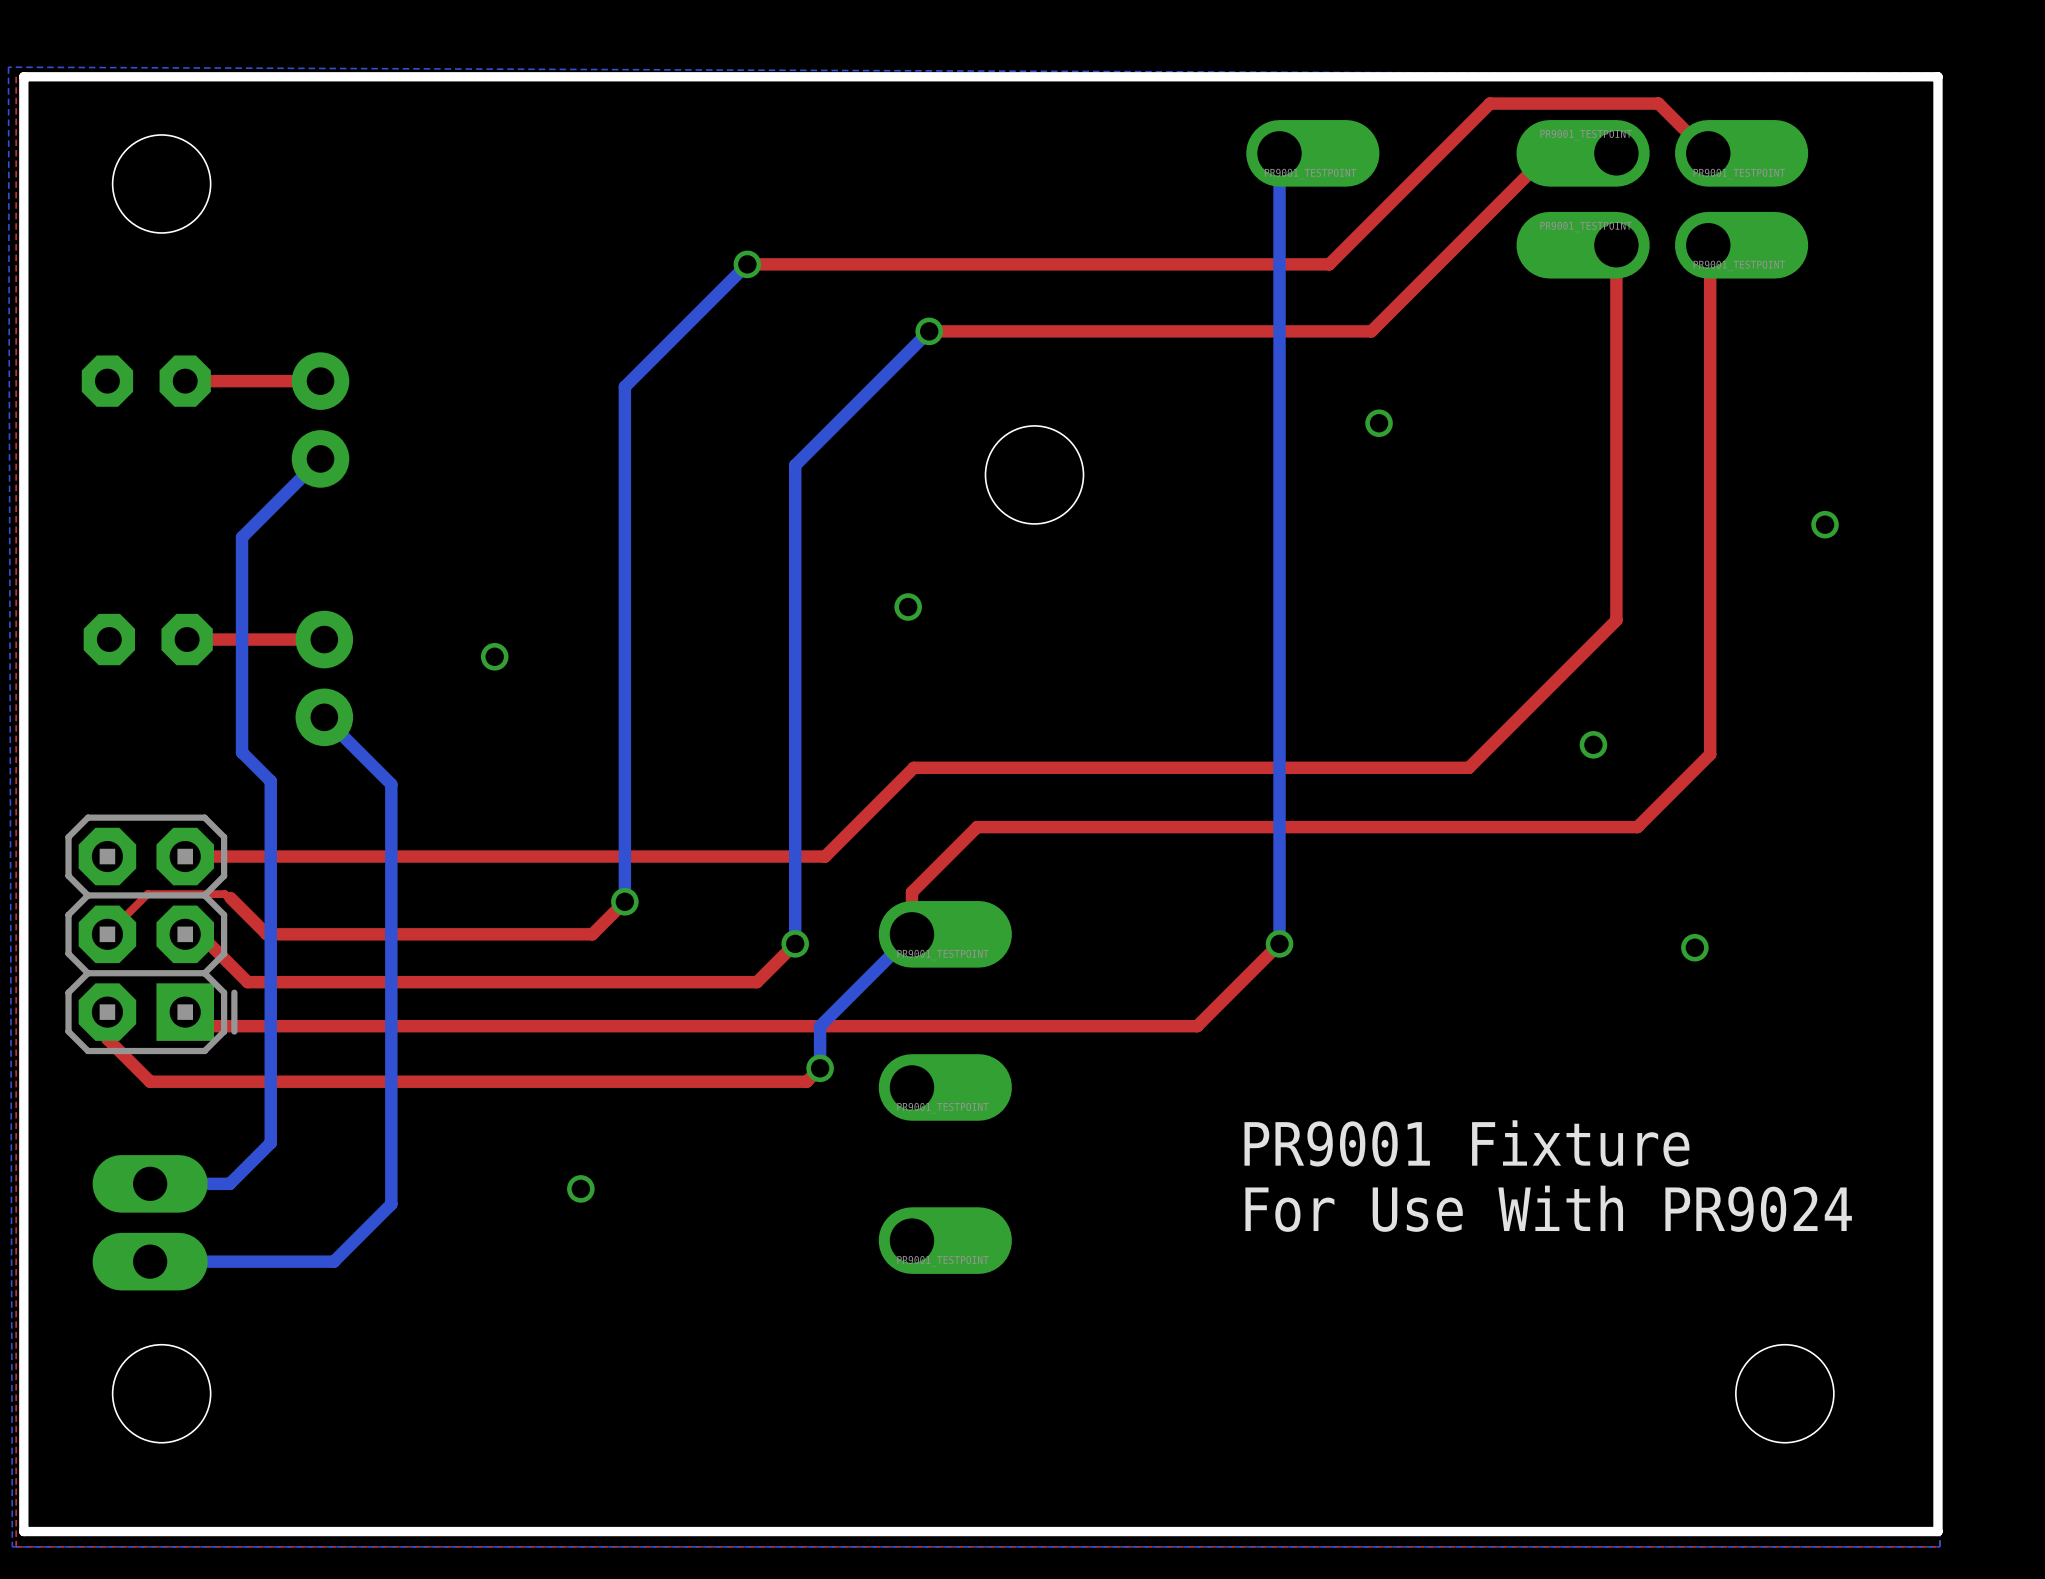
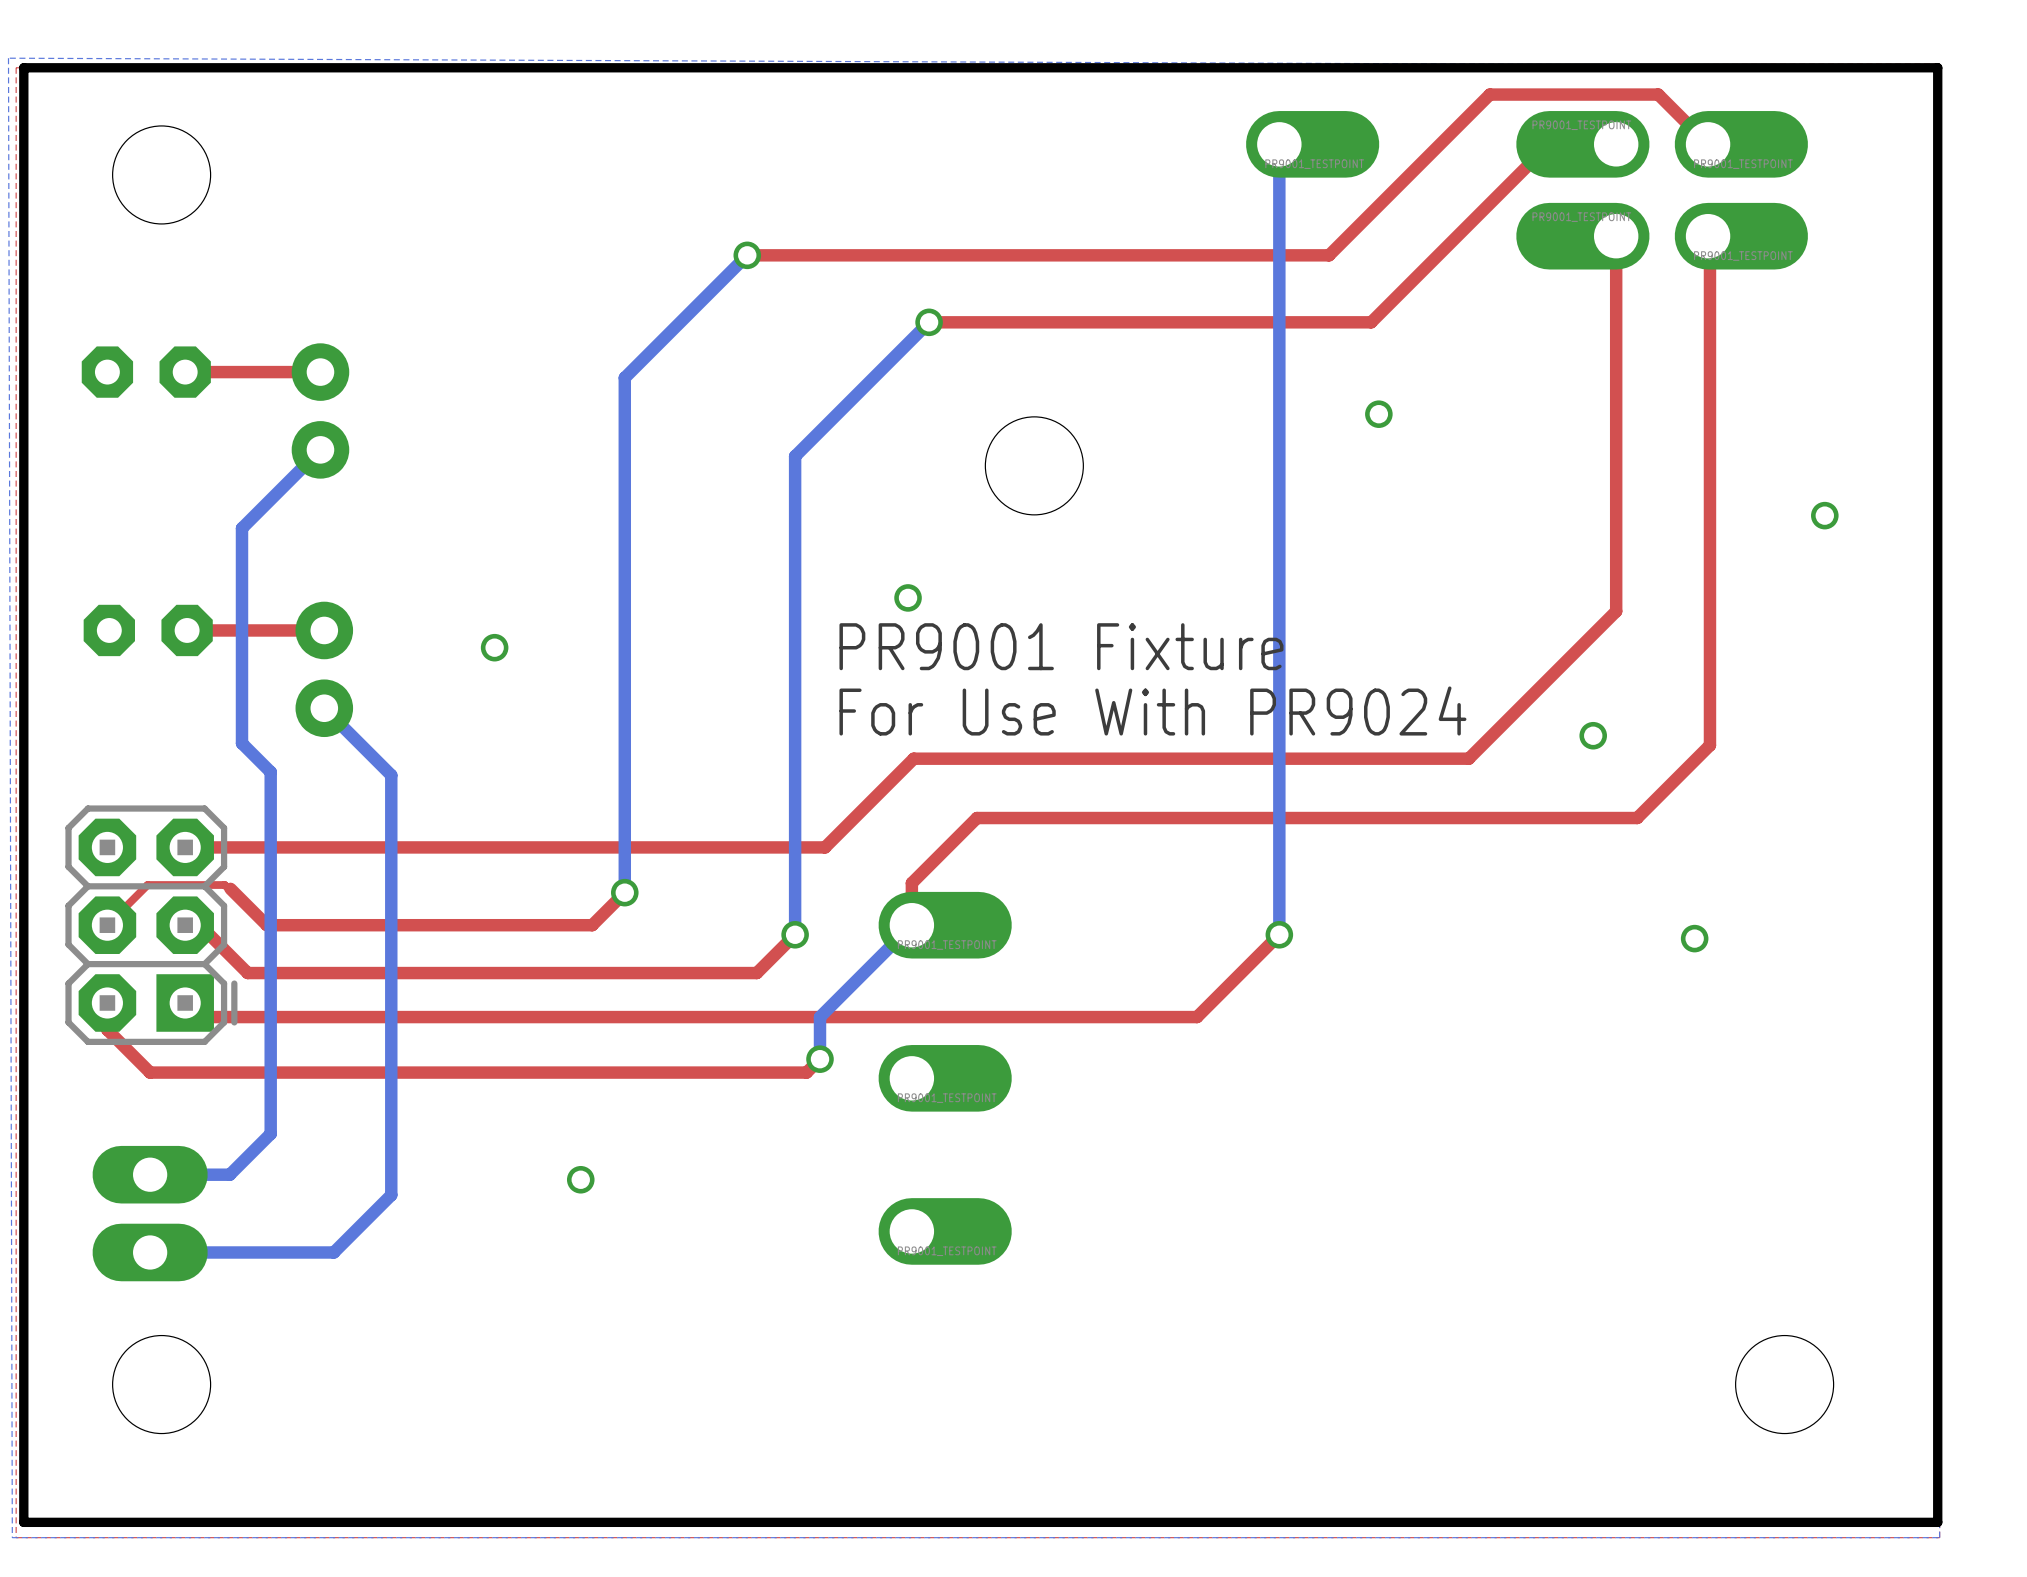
text position: PR9001 Fixture (1466, 1143) -> PR9001 Fixture (1061, 646)
text position: For Use With PR9024 (1548, 1208) -> For Use With PR9024 (1152, 711)

